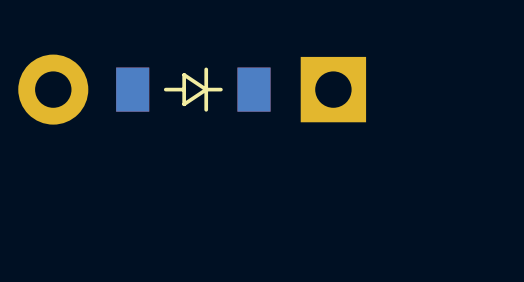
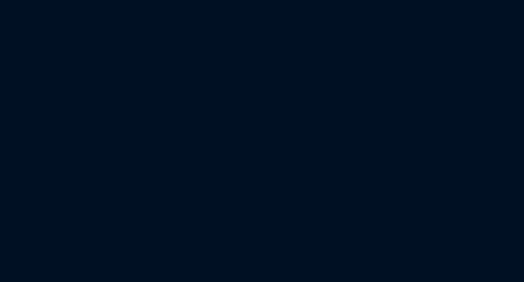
part: (192, 89) -> none

